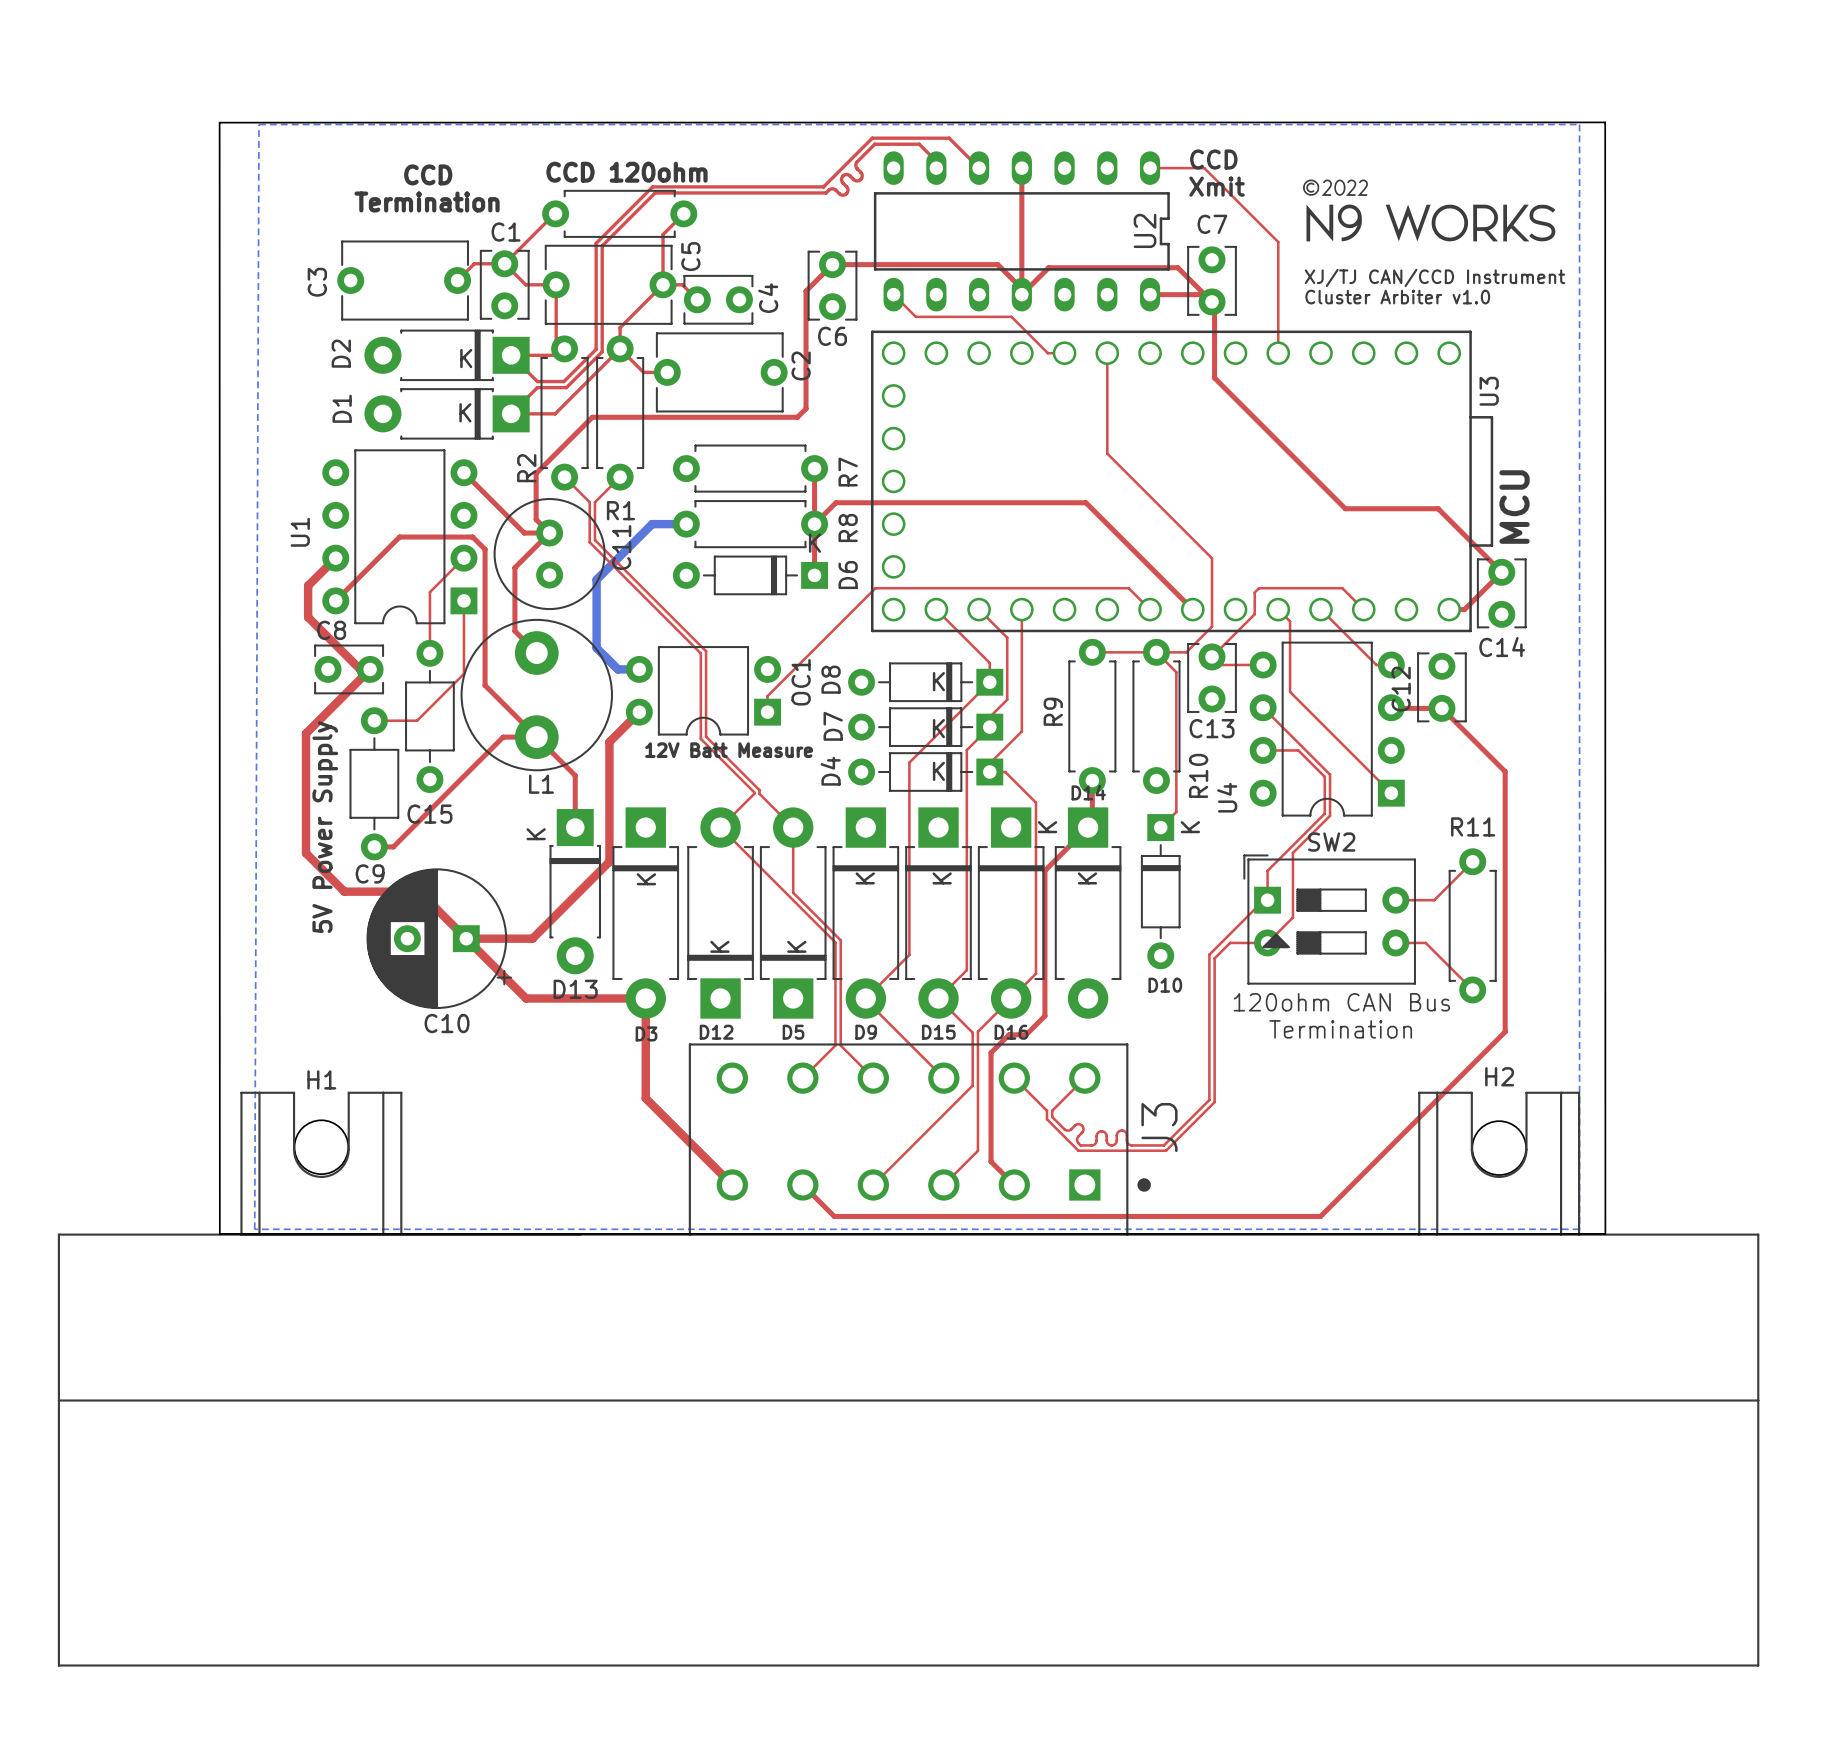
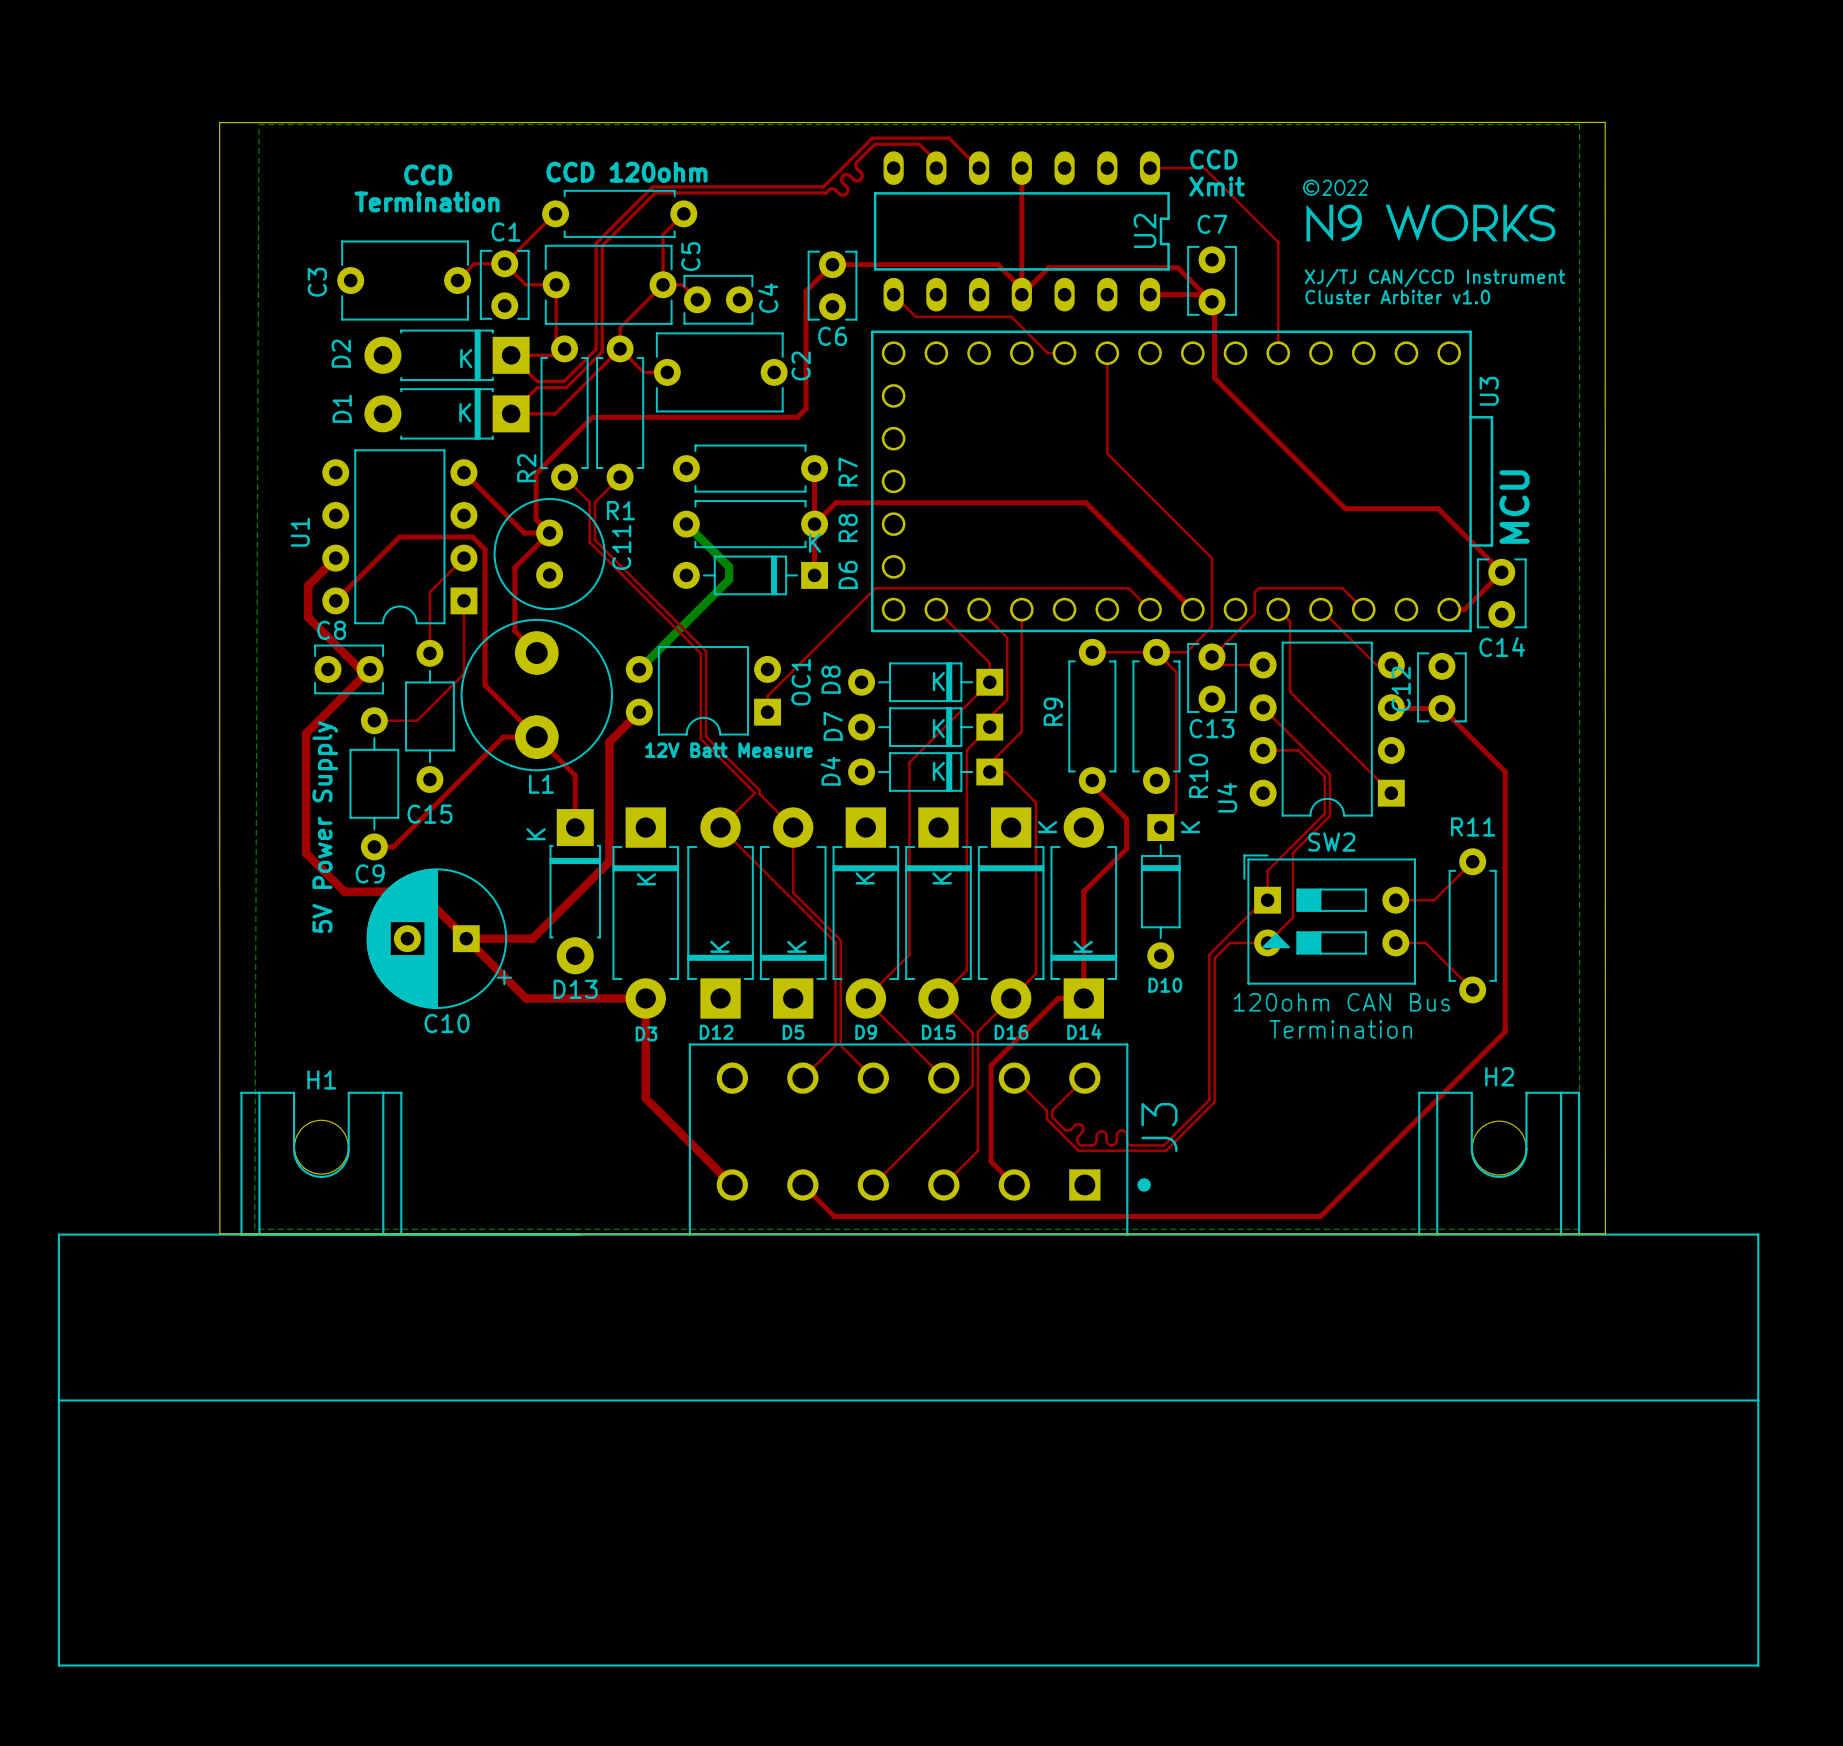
bottom track: (686, 524) (652, 524) (596, 579) (596, 648) (617, 669) (639, 669) -> (686, 524) (729, 566) (729, 579) (639, 669)
top track: (1092, 780) (1092, 823) (1044, 870) (1044, 1016) (1026, 1034) (1009, 1034) (991, 1052) (991, 1065) -> (1092, 784) (1126, 819) (1126, 848) (1083, 891) (1083, 998) (1058, 998) (991, 1065)
D14 rotation: 0° (1088, 913) -> 180° (1083, 913)

